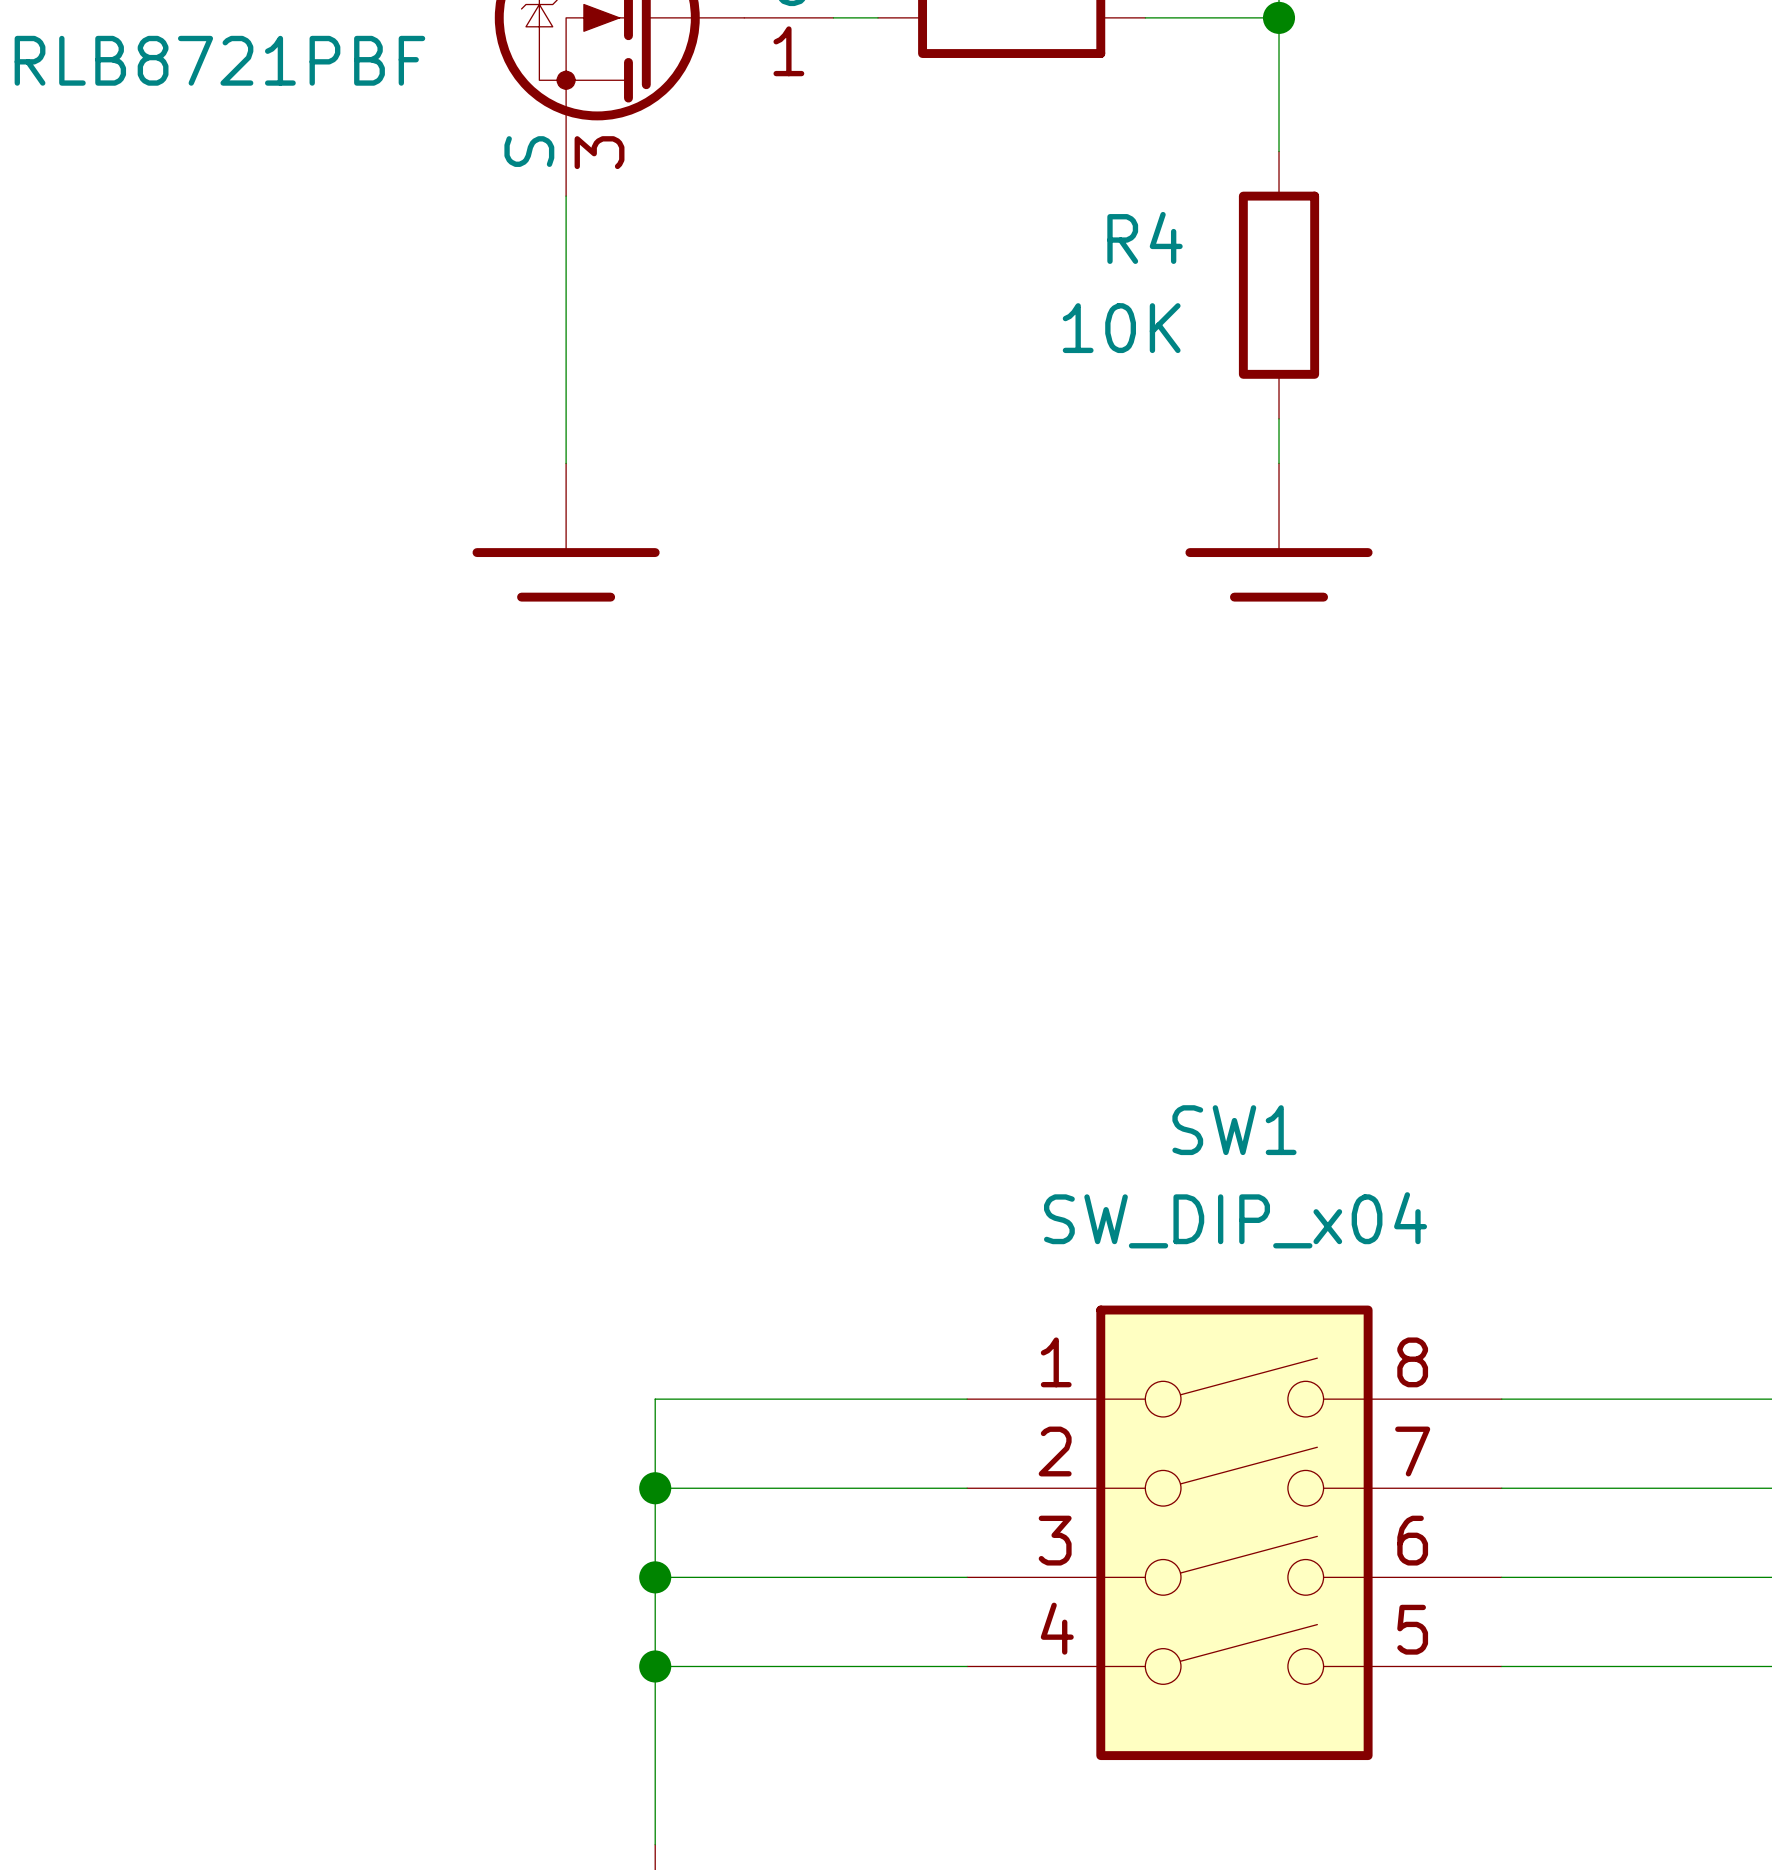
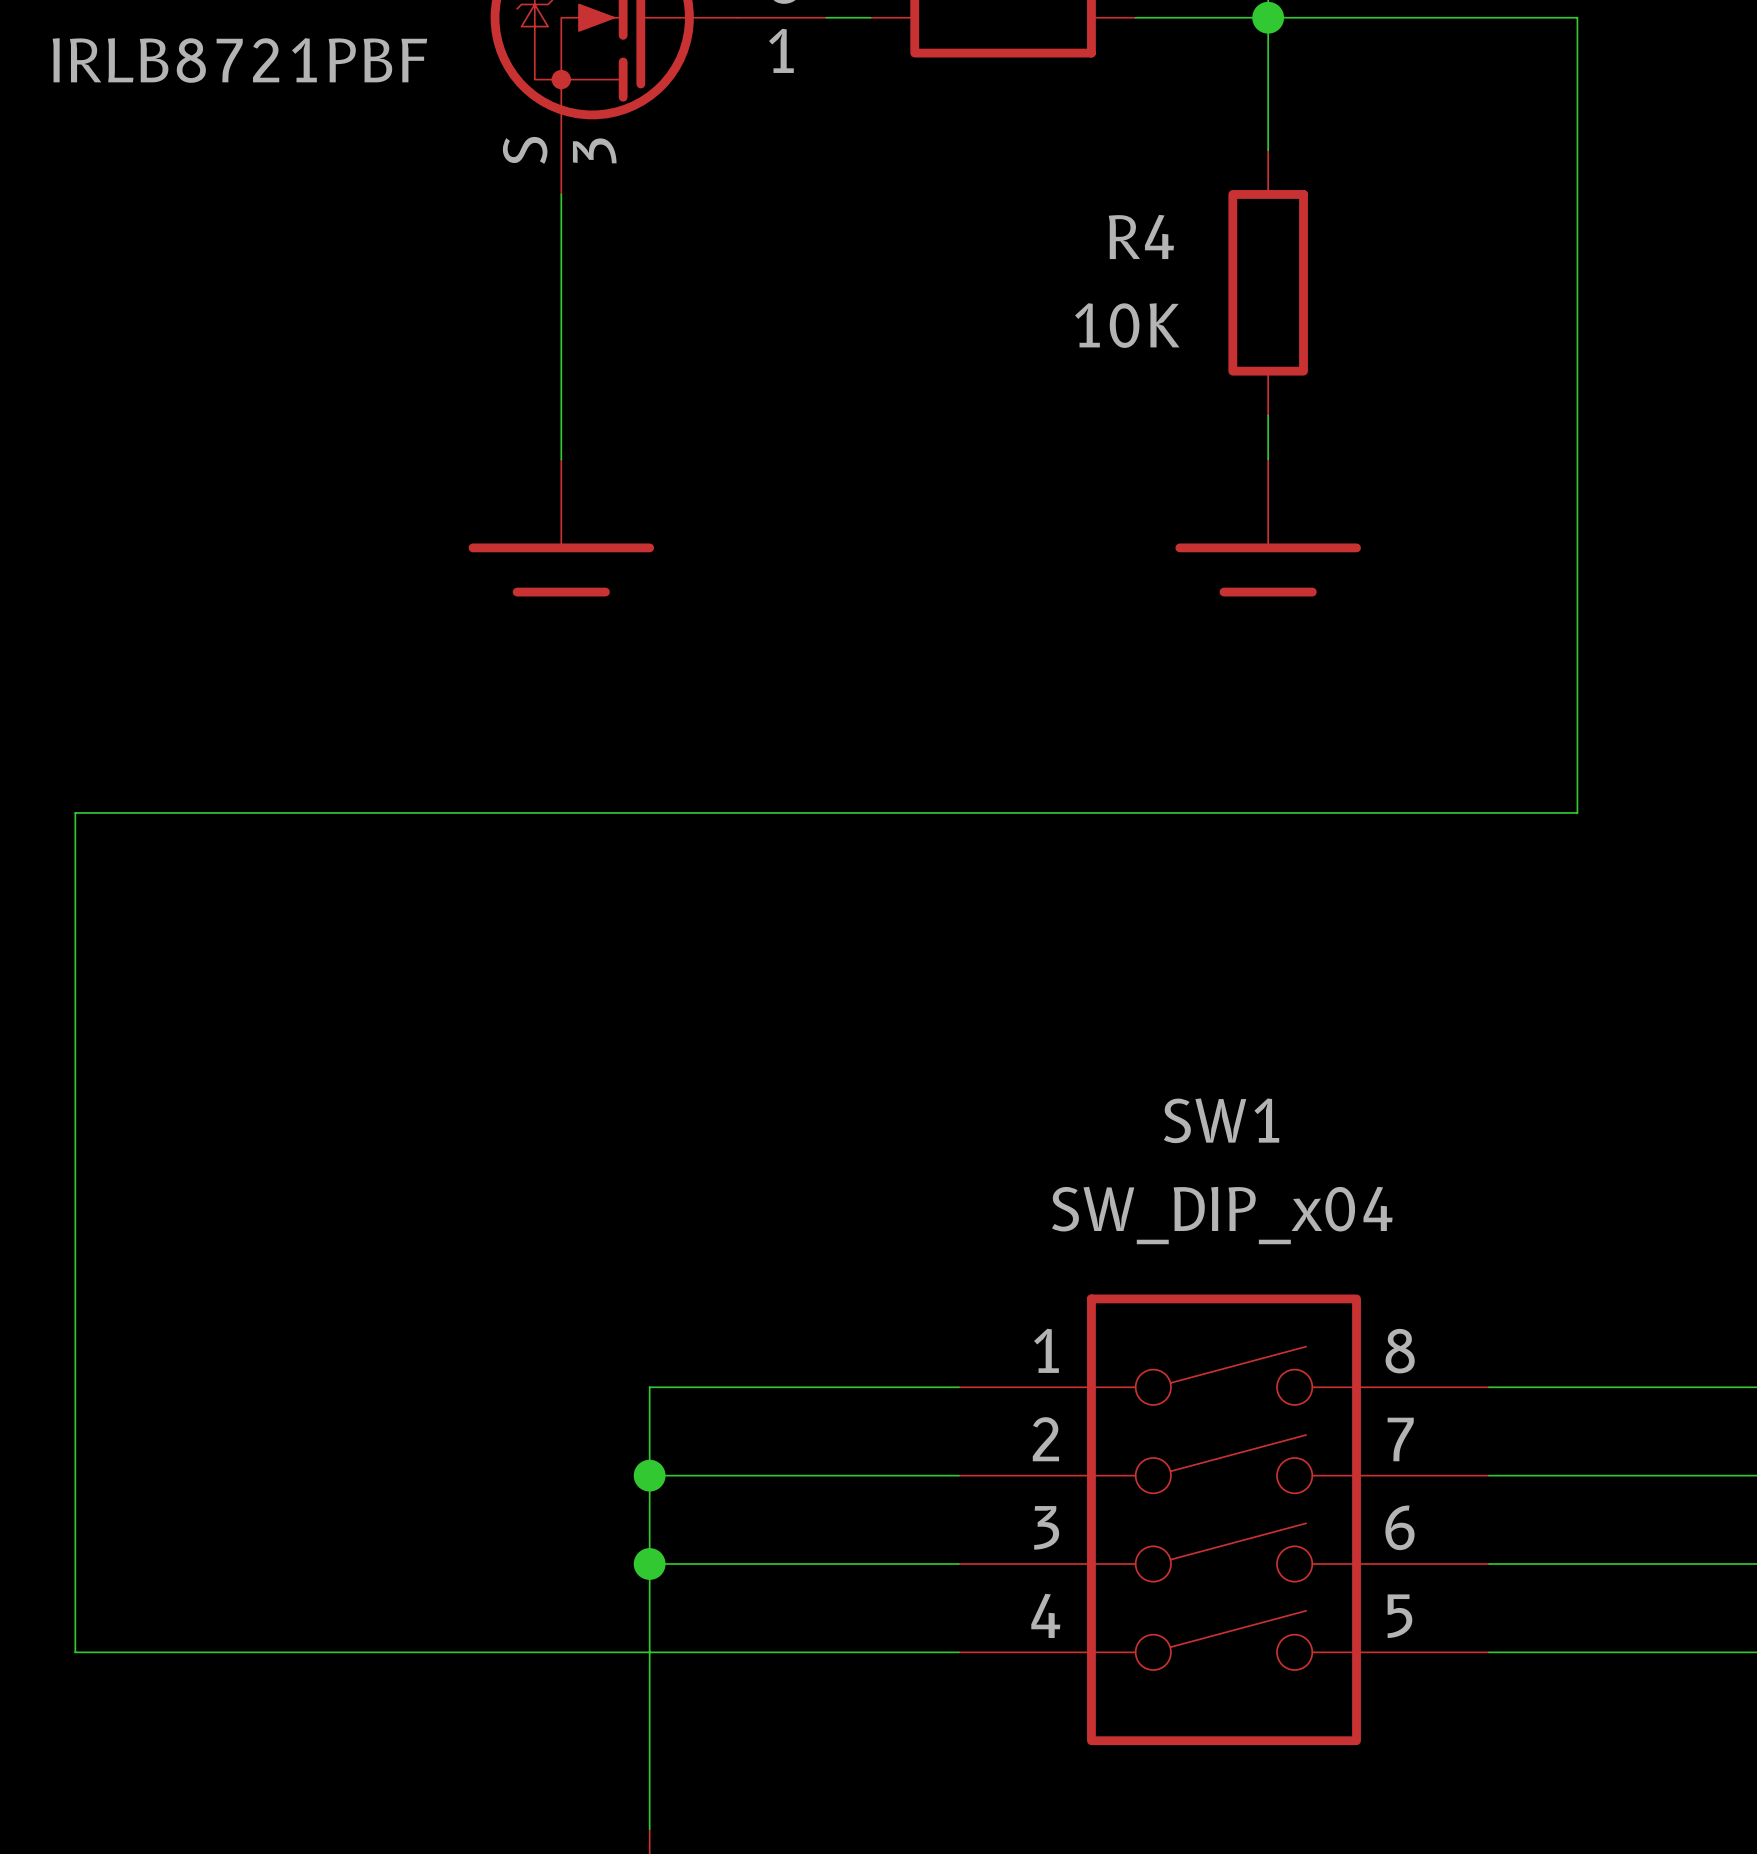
wire: none -> (1268, 17) (1577, 17) (1577, 812) (75, 812) (75, 1652) (649, 1652)
junction: (655, 1666) -> none

